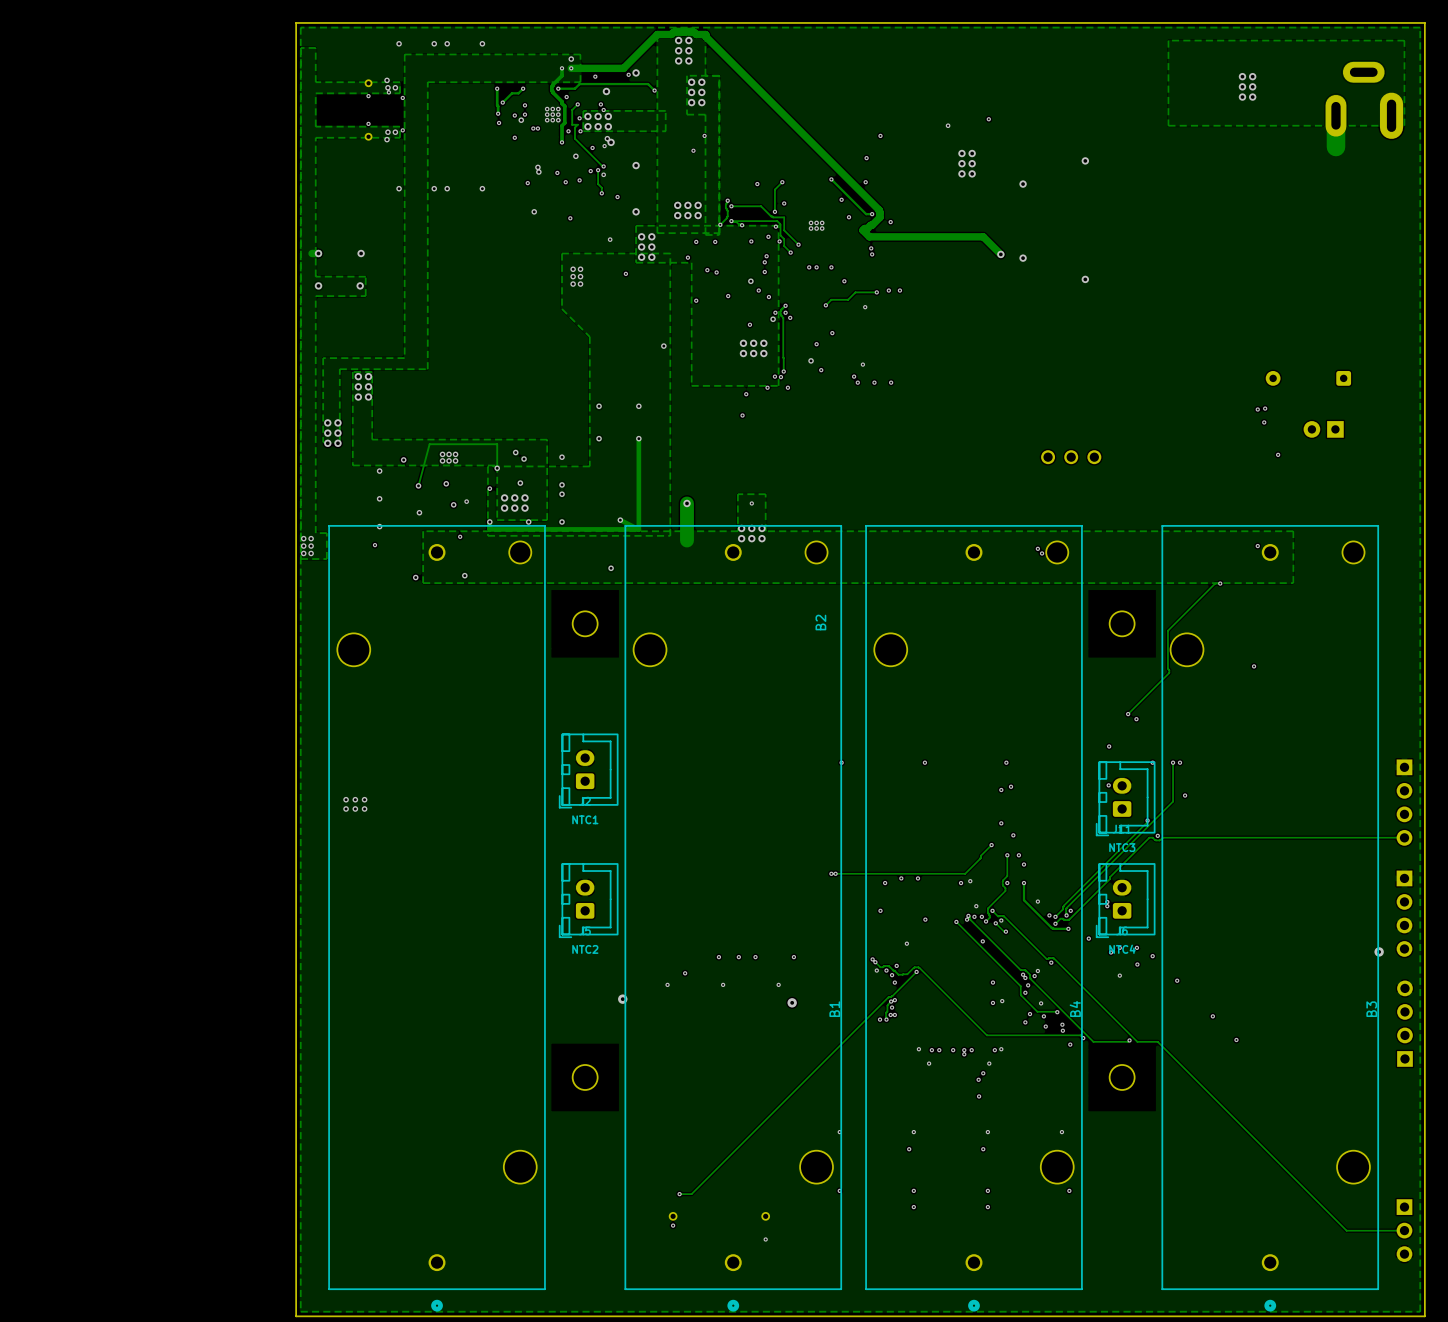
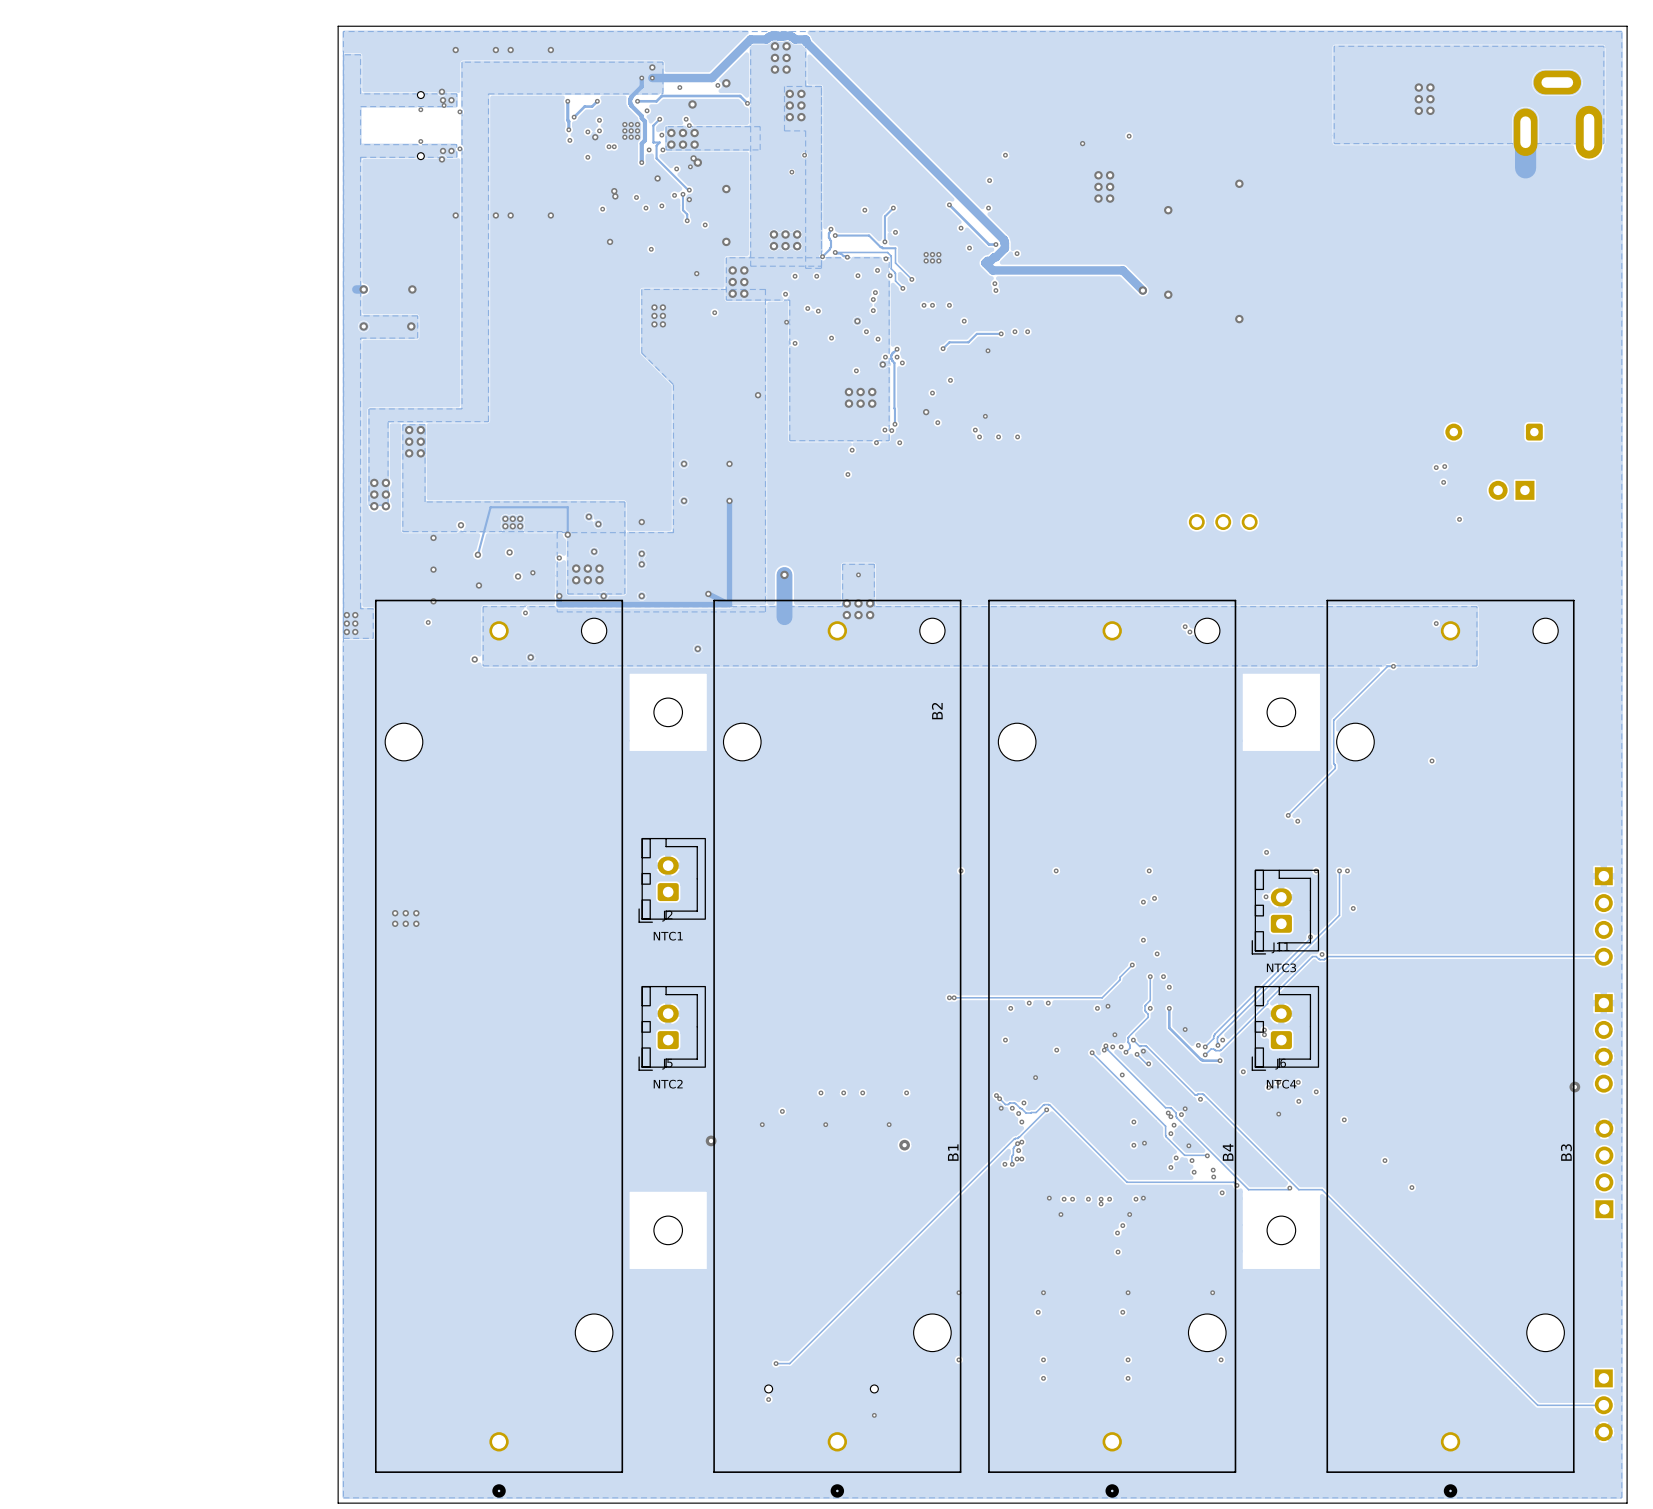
via: none -> (786, 322)

